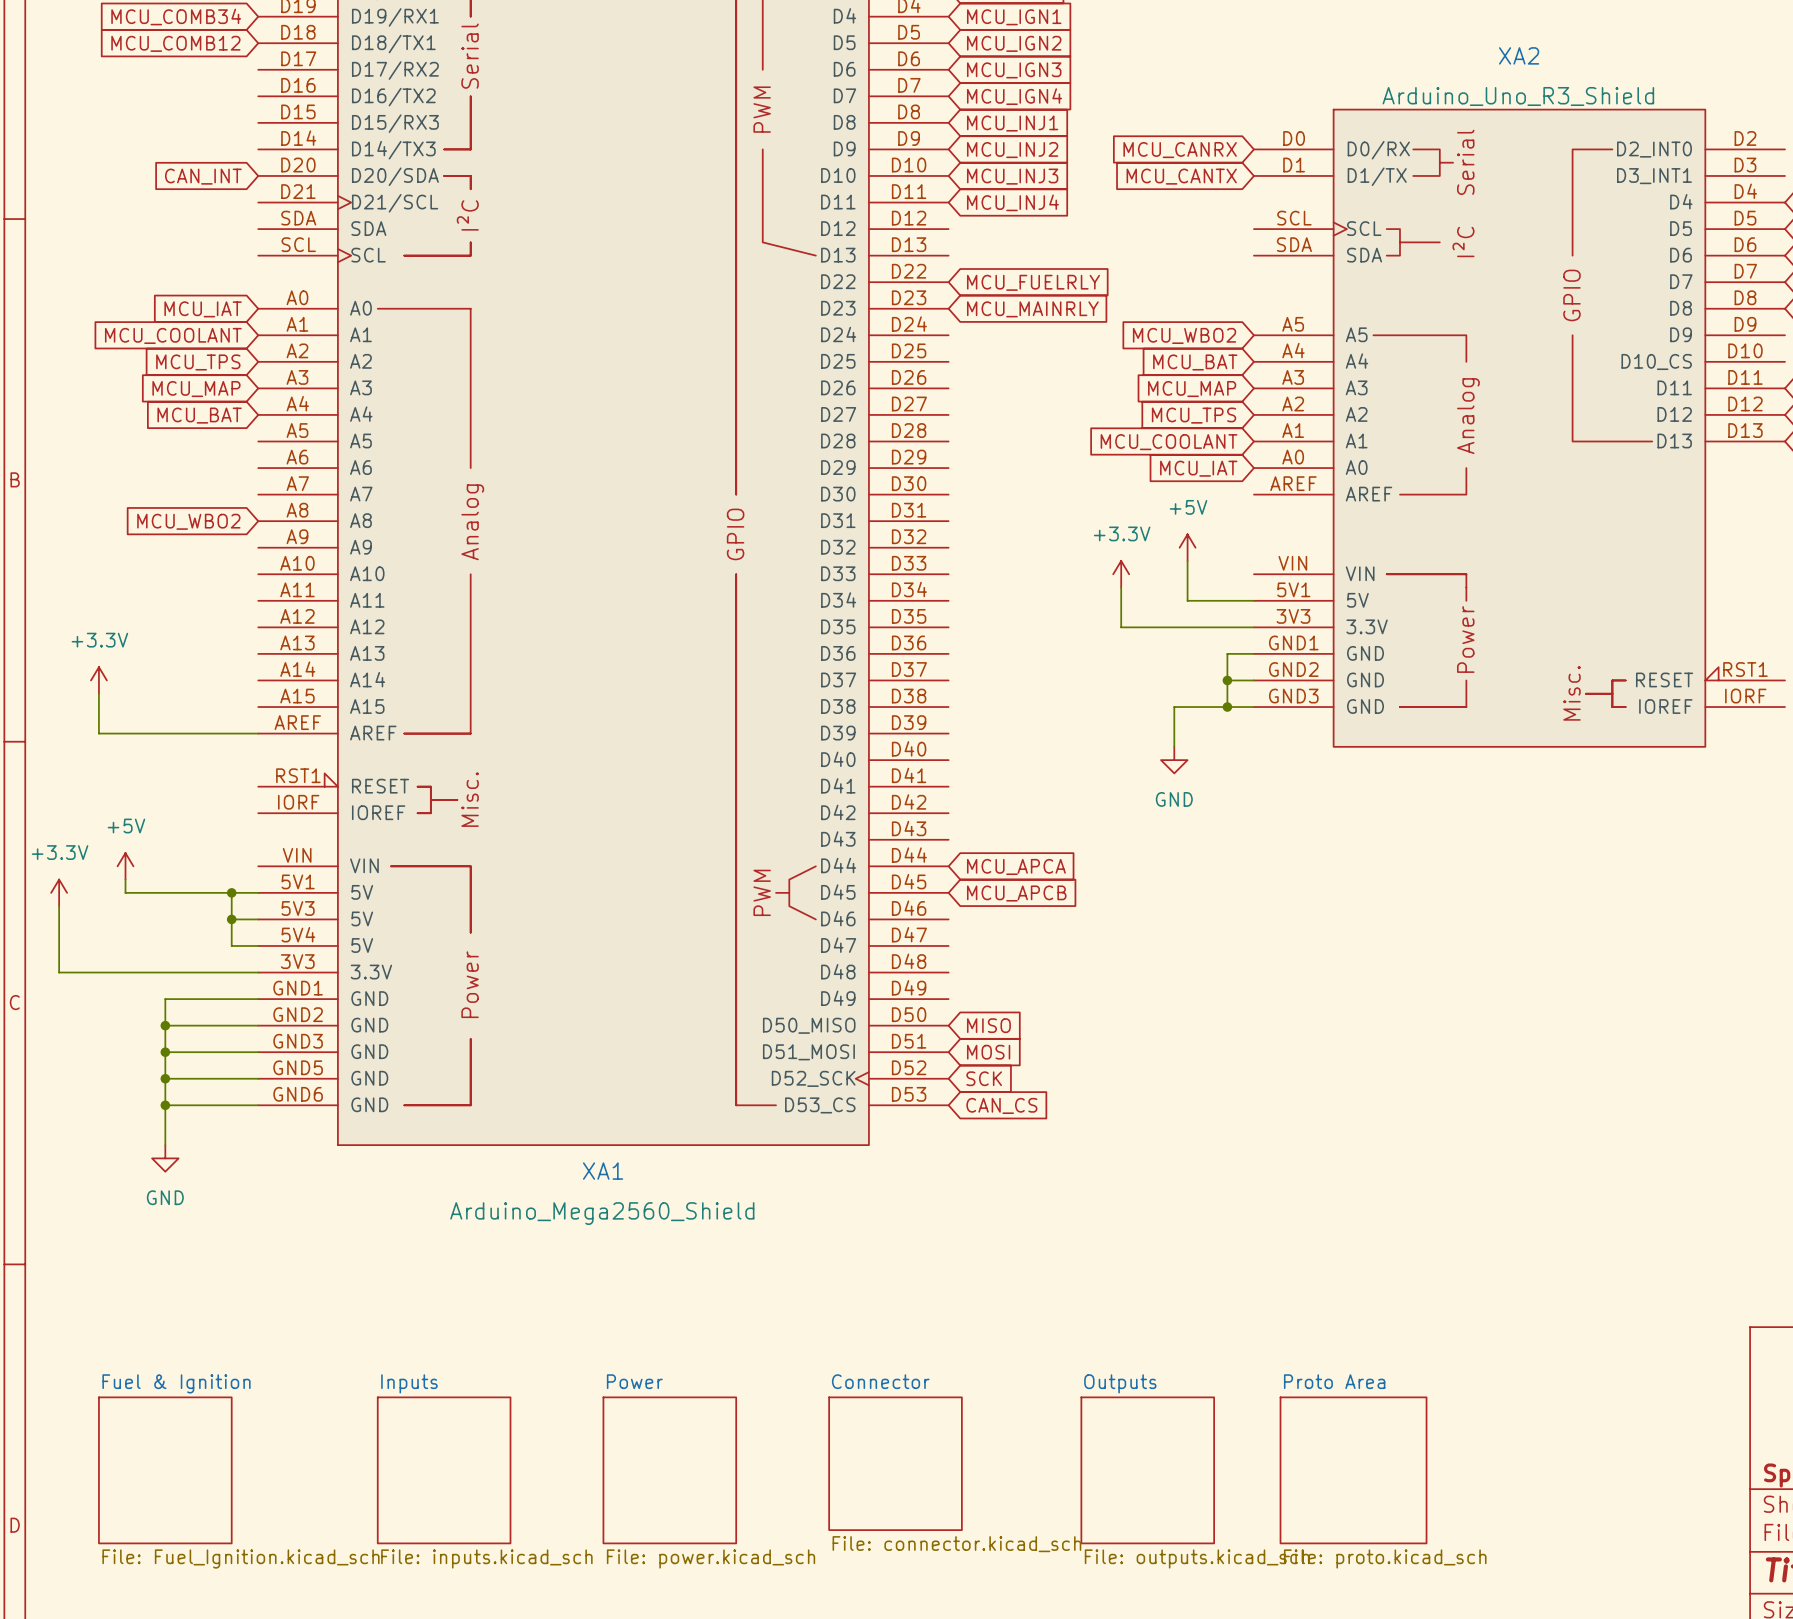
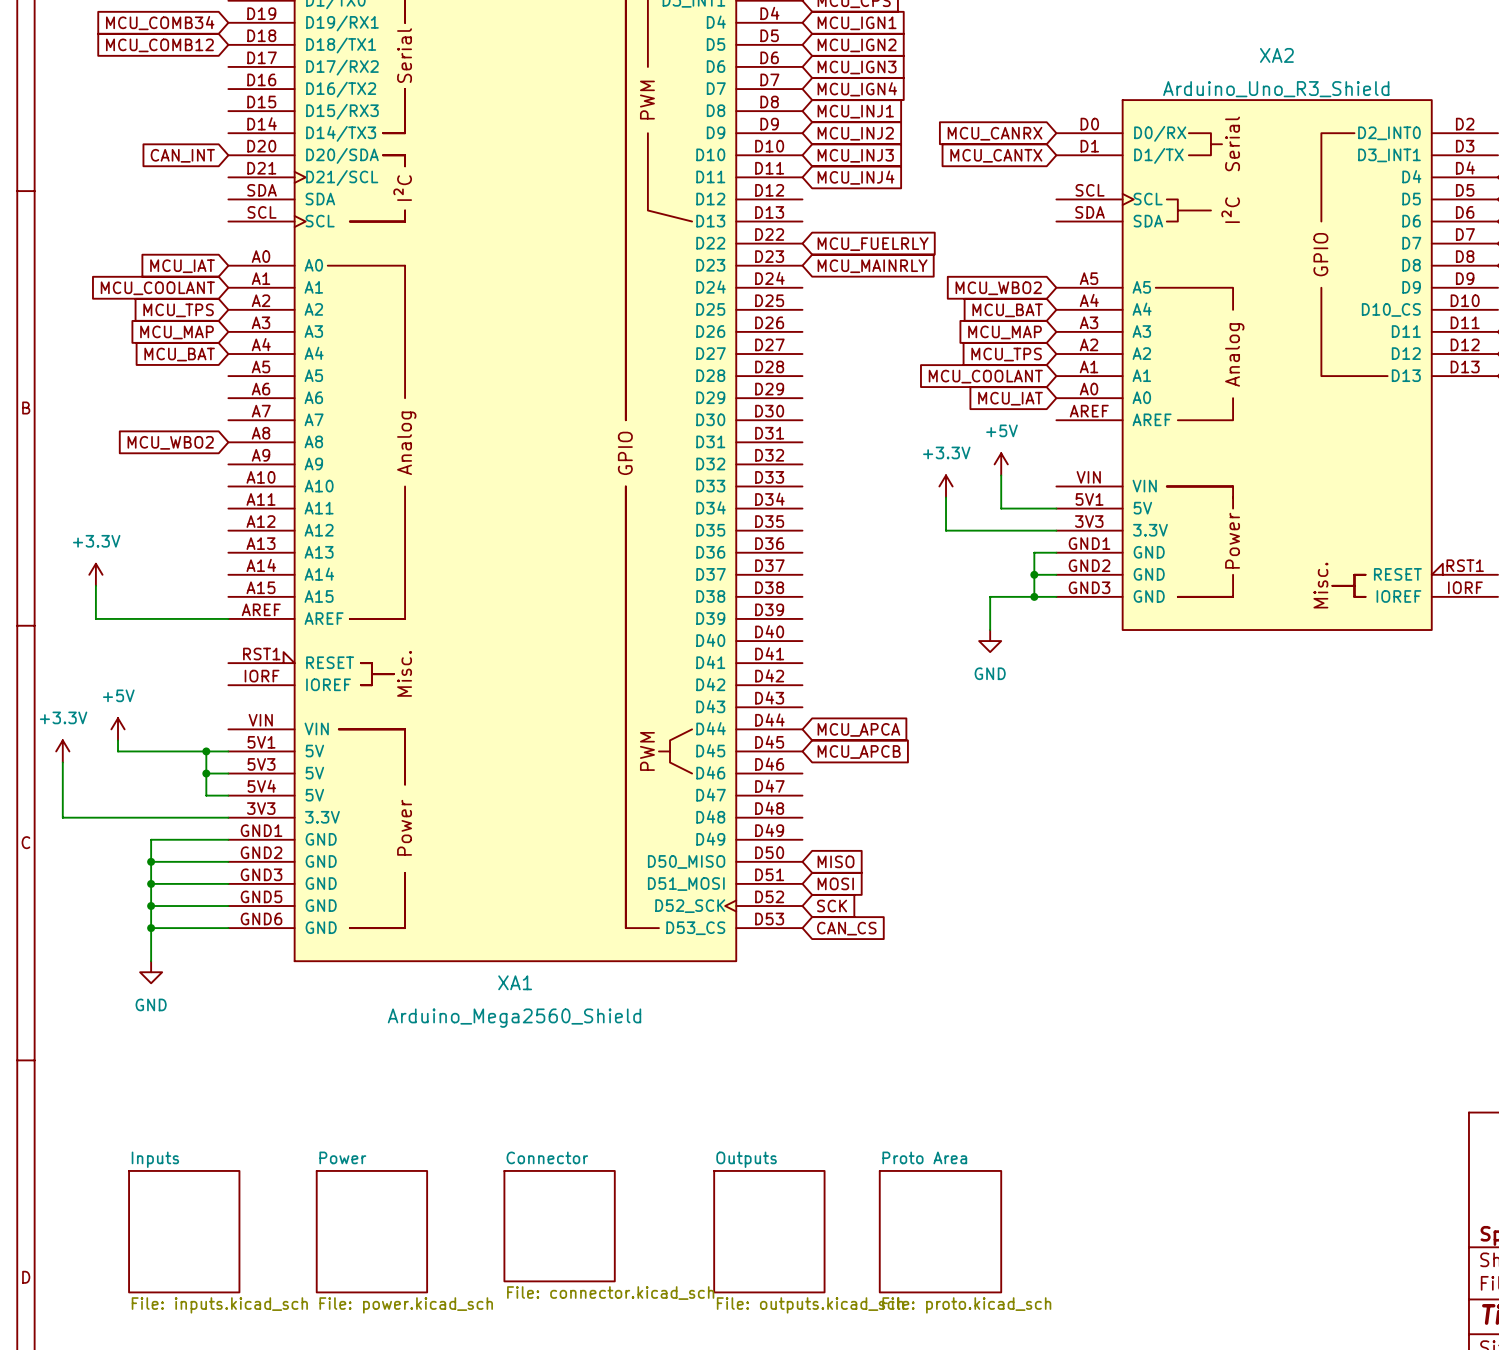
sheet Connector position: (895, 1463) -> (559, 1226)
sheet Fuel & Ignition: File: Fuel_Ignition.kicad_sch (165, 1470) -> none
sheet Inputs position: (444, 1470) -> (184, 1231)
sheet Power position: (669, 1470) -> (371, 1231)
sheet Outputs position: (1147, 1470) -> (769, 1231)
sheet Proto Area position: (1353, 1470) -> (940, 1231)

